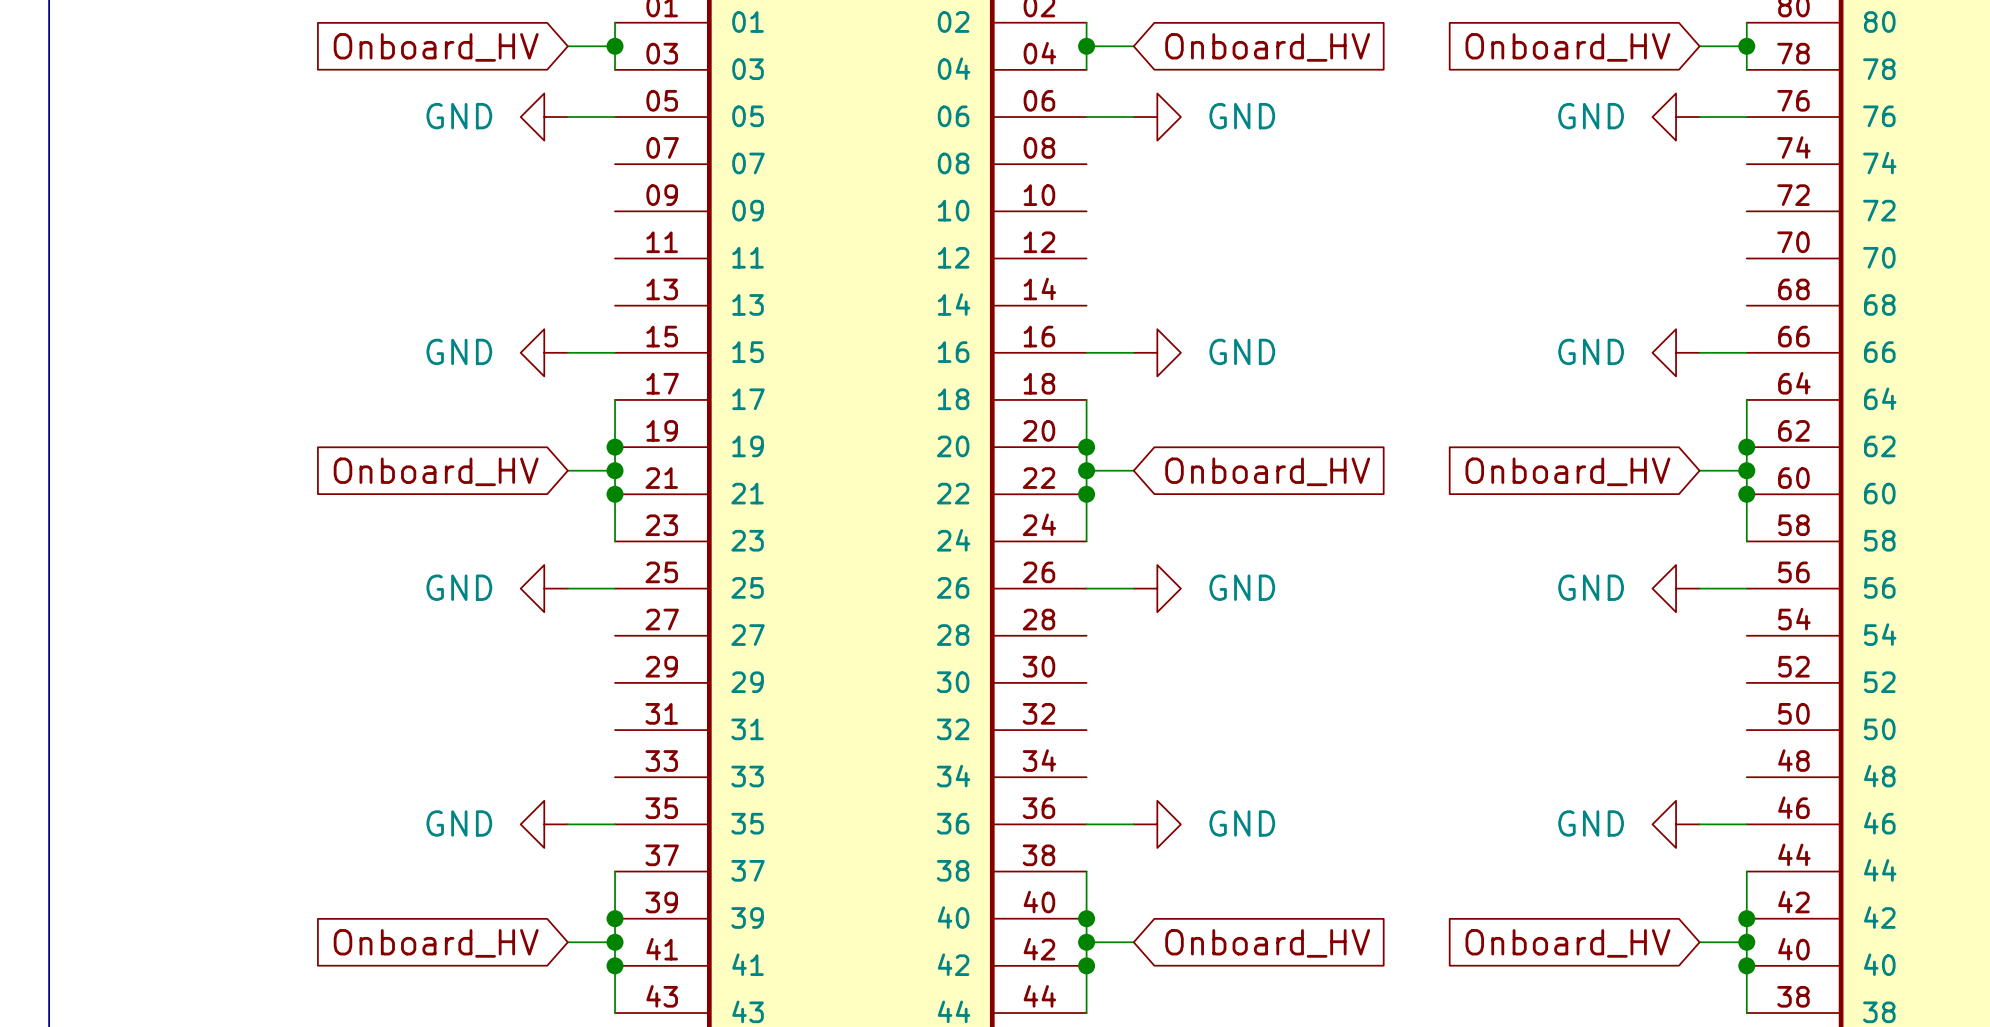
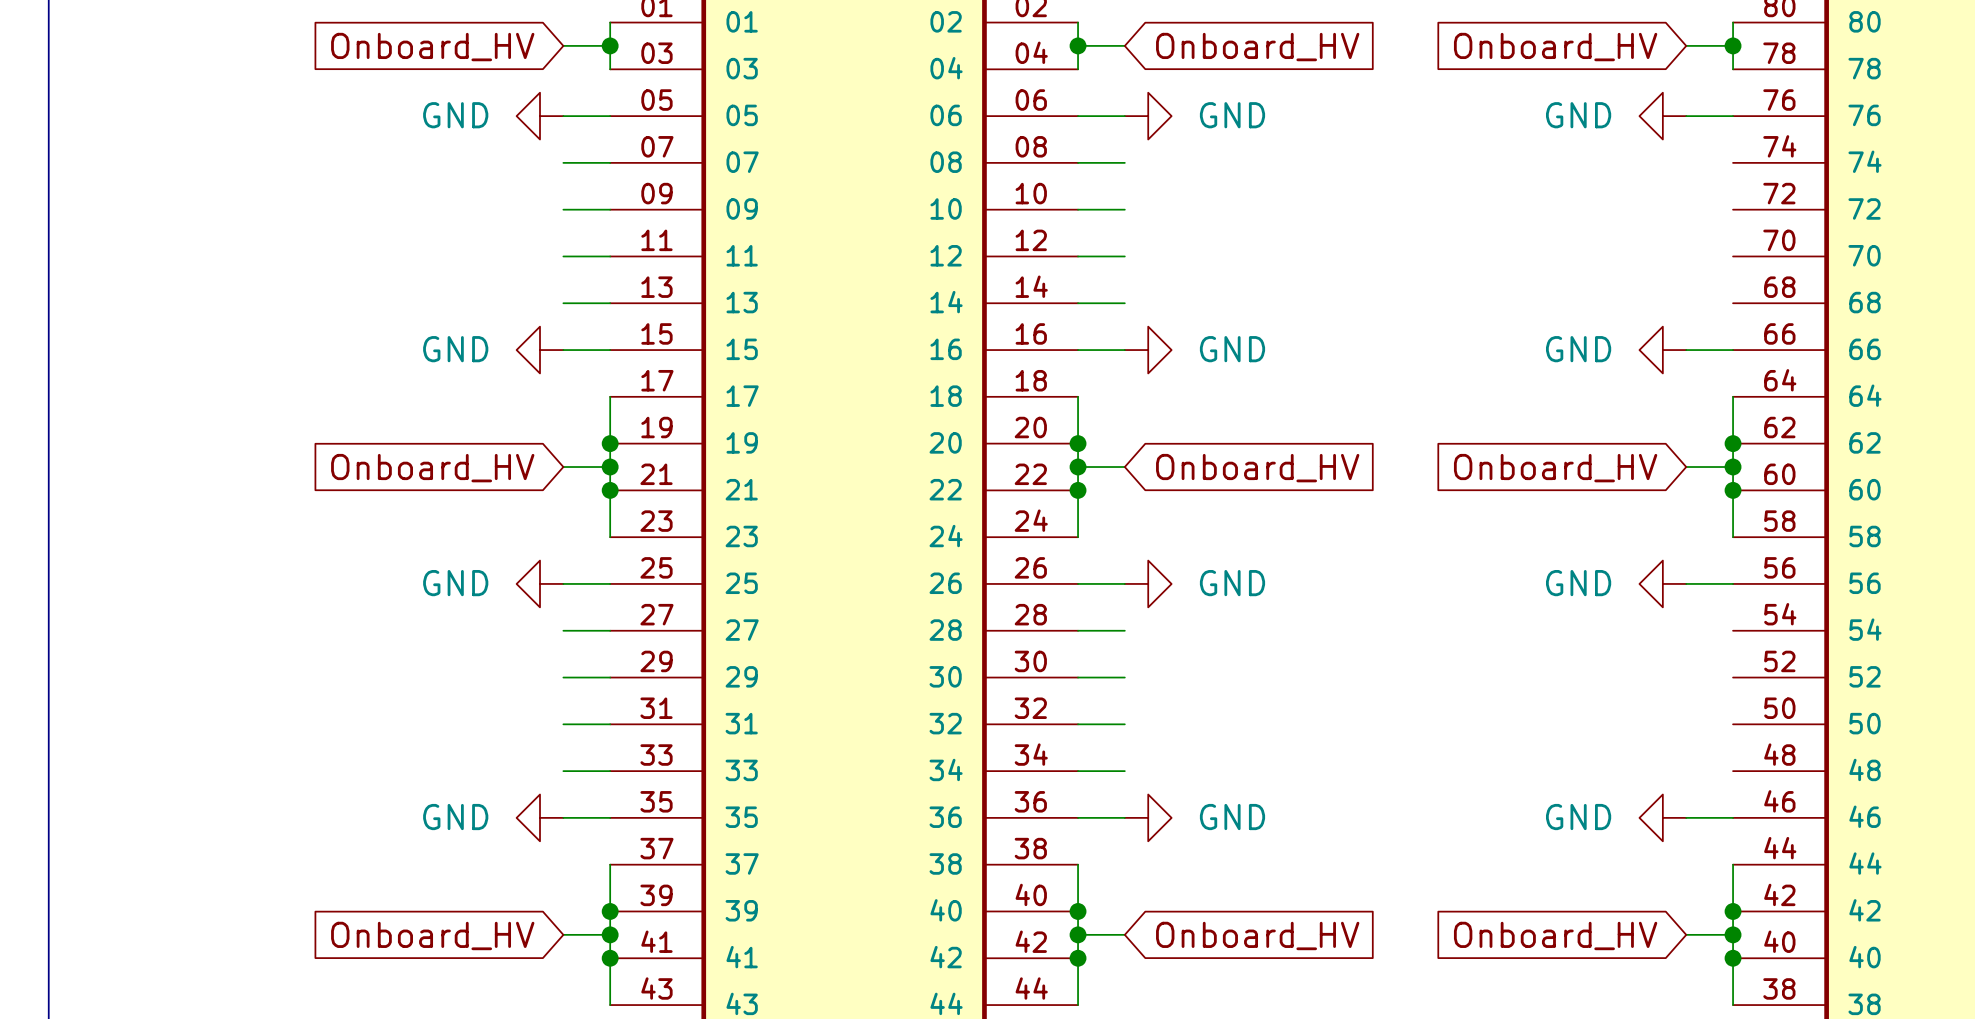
wire: none -> (563, 162) (610, 162)
wire: none -> (1078, 162) (1124, 162)
wire: none -> (563, 209) (610, 209)
wire: none -> (1078, 209) (1124, 209)
wire: none -> (563, 256) (610, 256)
wire: none -> (1078, 256) (1124, 256)
wire: none -> (563, 303) (610, 303)
wire: none -> (1078, 303) (1124, 303)
wire: none -> (563, 630) (610, 630)
wire: none -> (1078, 630) (1124, 630)
wire: none -> (563, 677) (610, 677)
wire: none -> (1078, 677) (1124, 677)
wire: none -> (563, 724) (610, 724)
wire: none -> (1078, 724) (1124, 724)
wire: none -> (563, 771) (610, 771)
wire: none -> (1078, 771) (1124, 771)

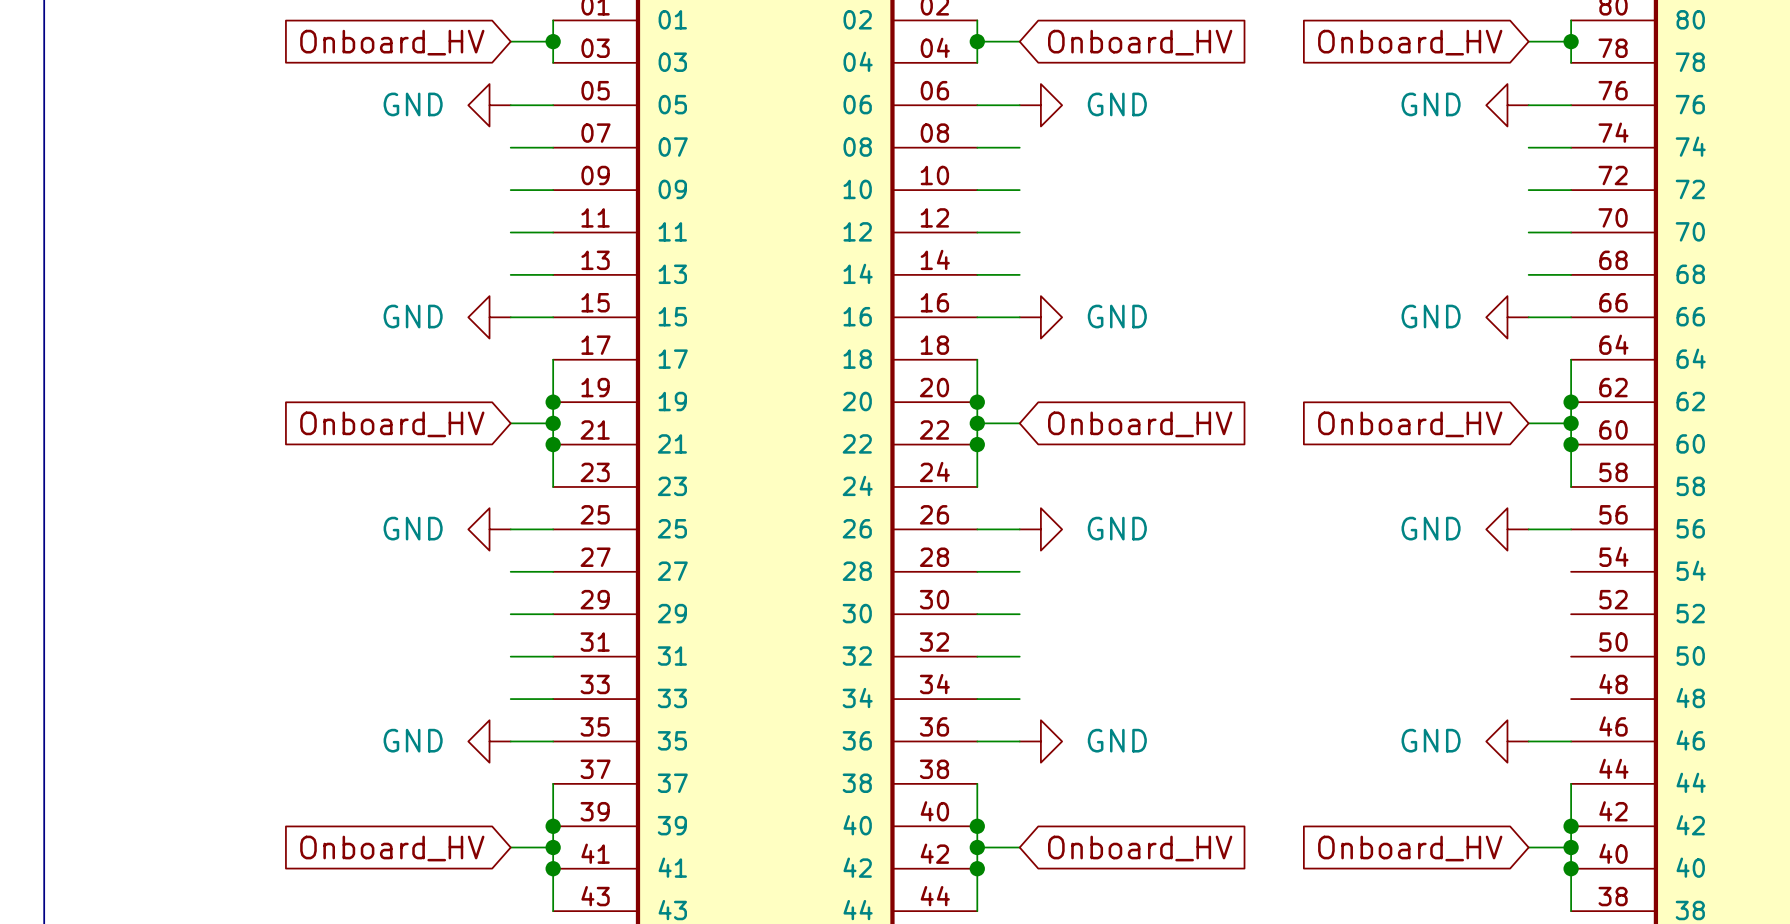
wire: none -> (1528, 147) (1571, 147)
wire: none -> (1528, 190) (1571, 190)
wire: none -> (1528, 232) (1571, 232)
wire: none -> (1528, 274) (1571, 274)

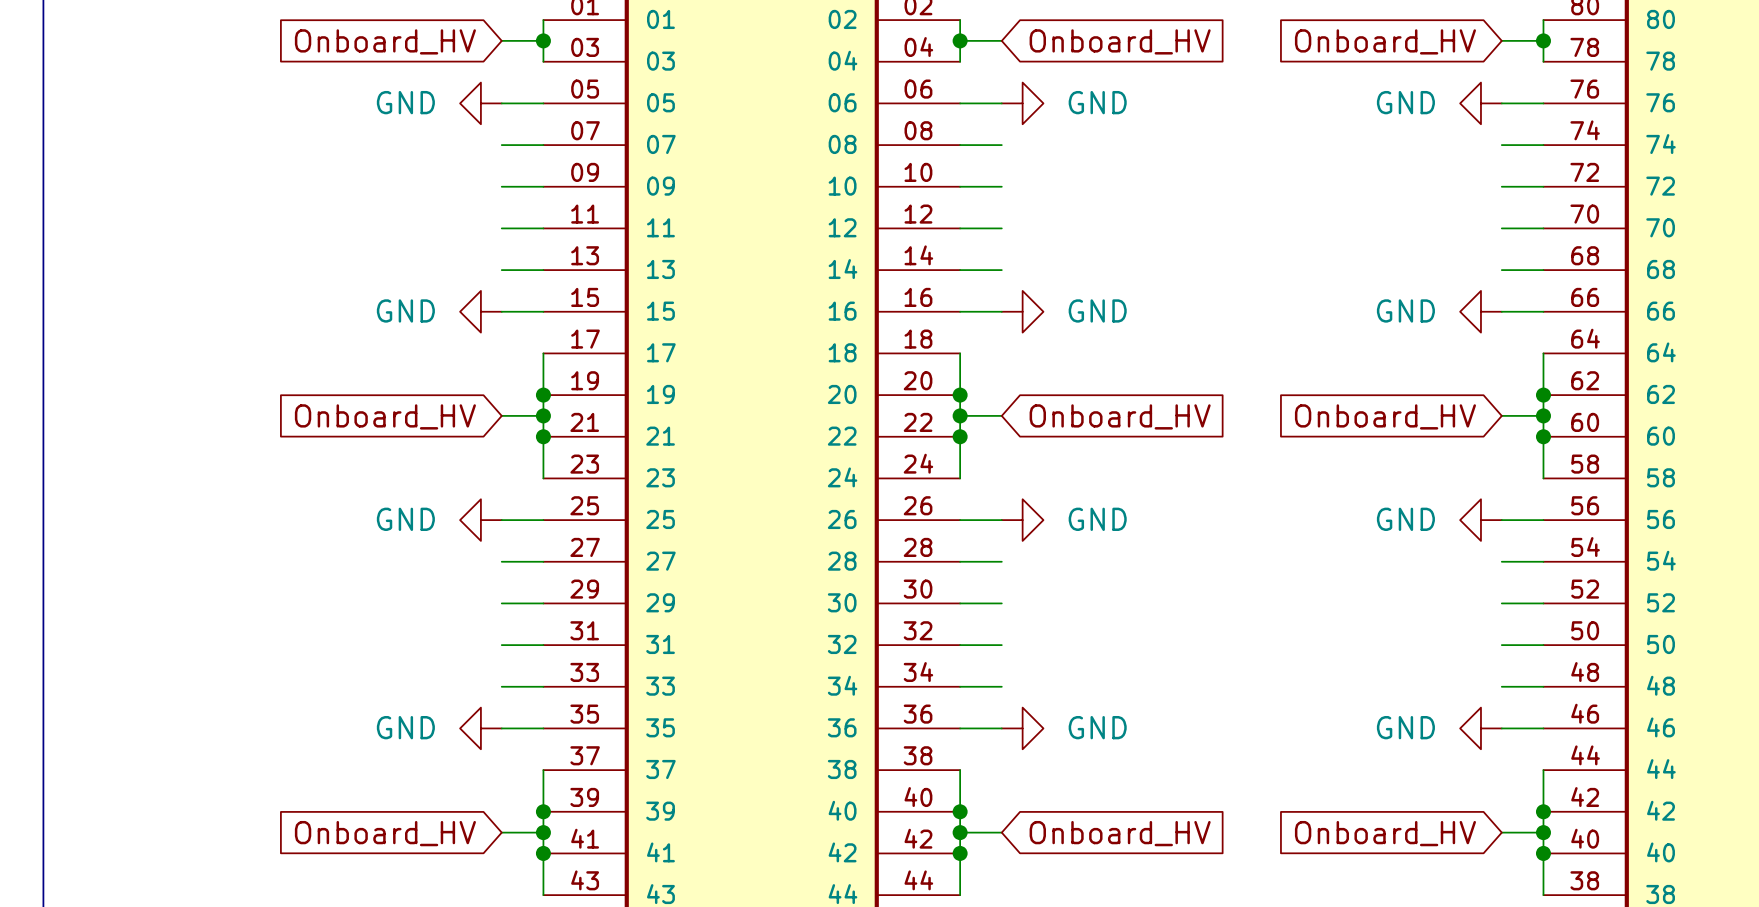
wire: none -> (1501, 561) (1543, 561)
wire: none -> (1501, 603) (1543, 603)
wire: none -> (1501, 645) (1543, 645)
wire: none -> (1501, 686) (1543, 686)

